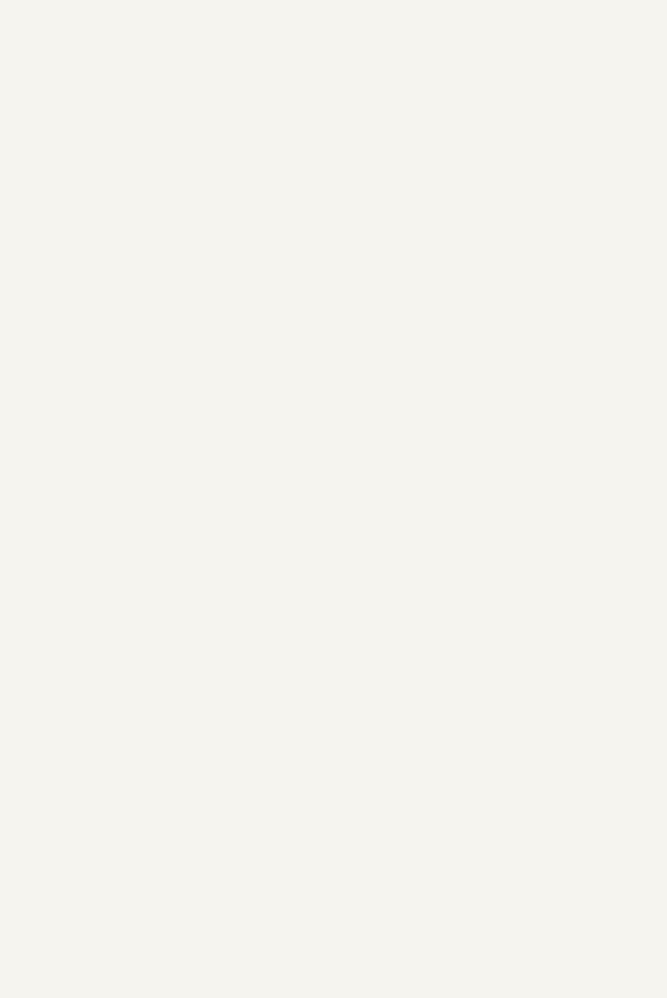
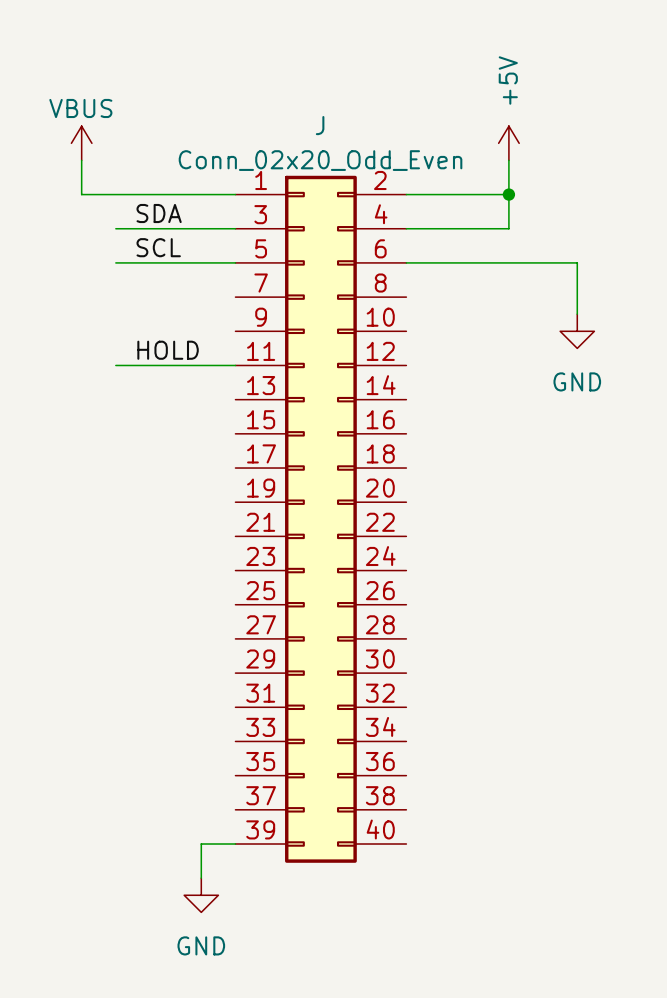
power symbol: none -> VBUS (81, 143)
power symbol: none -> +5V (508, 143)
wire: none -> (81, 160) (81, 194) (235, 194)
wire: none -> (508, 160) (508, 228) (406, 228)
wire: none -> (406, 194) (508, 194)
junction: none -> (508, 194)
label: none -> SDA (159, 213)
wire: none -> (115, 228) (235, 228)
label: none -> SCL (158, 247)
wire: none -> (115, 262) (235, 262)
wire: none -> (406, 262) (577, 262) (577, 314)
power symbol: none -> GND (577, 331)
label: none -> HOLD (168, 350)
wire: none -> (115, 365) (235, 365)
J: none -> Conn_02x20_Odd_Even (320, 519)
wire: none -> (235, 844) (201, 844) (201, 878)
power symbol: none -> GND (201, 895)

